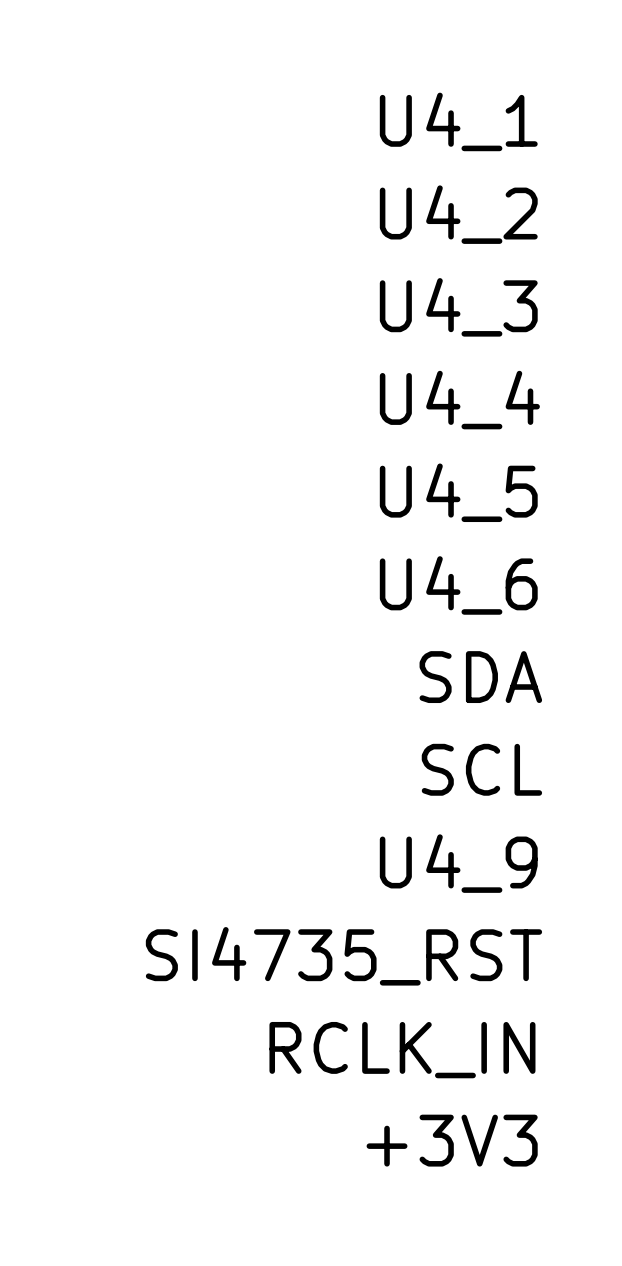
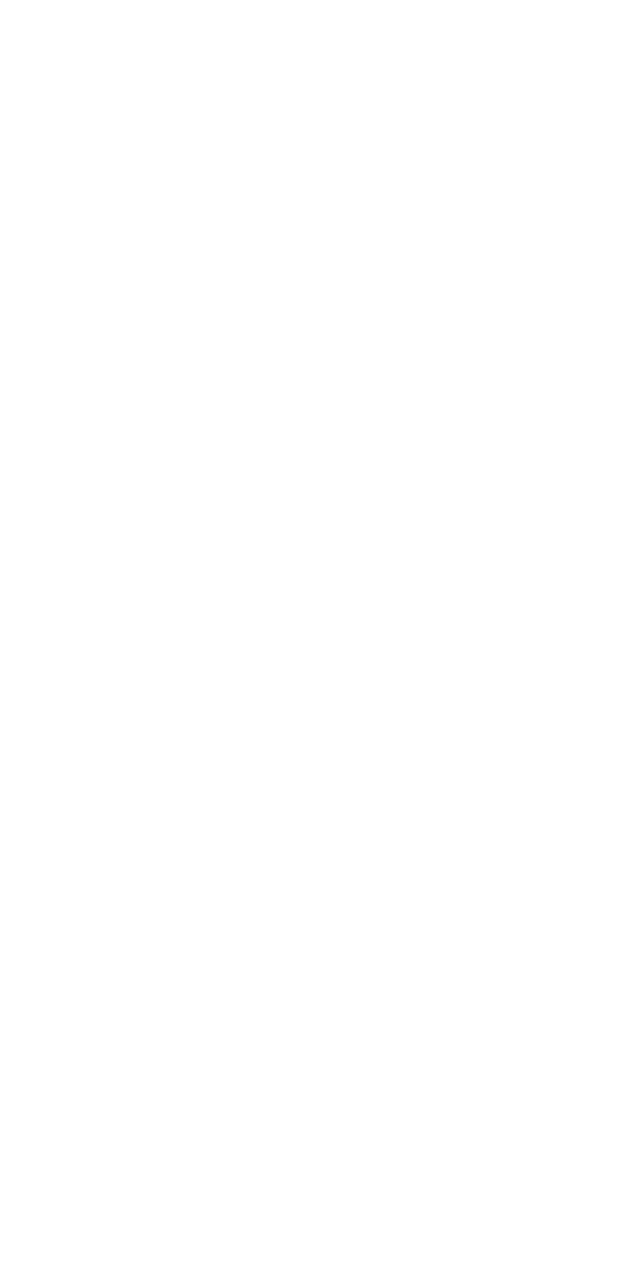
label: U4_1 (458, 121) -> none
label: U4_2 (458, 214) -> none
label: U4_3 (458, 307) -> none
label: U4_4 (459, 400) -> none
label: U4_5 (458, 492) -> none
label: U4_6 (458, 585) -> none
label: SDA (480, 677) -> none
label: SCL (481, 769) -> none
label: U4_9 (458, 863) -> none
label: SI4735_RST (343, 956) -> none
label: RCLK_IN (402, 1050) -> none
label: +3V3 (452, 1140) -> none

